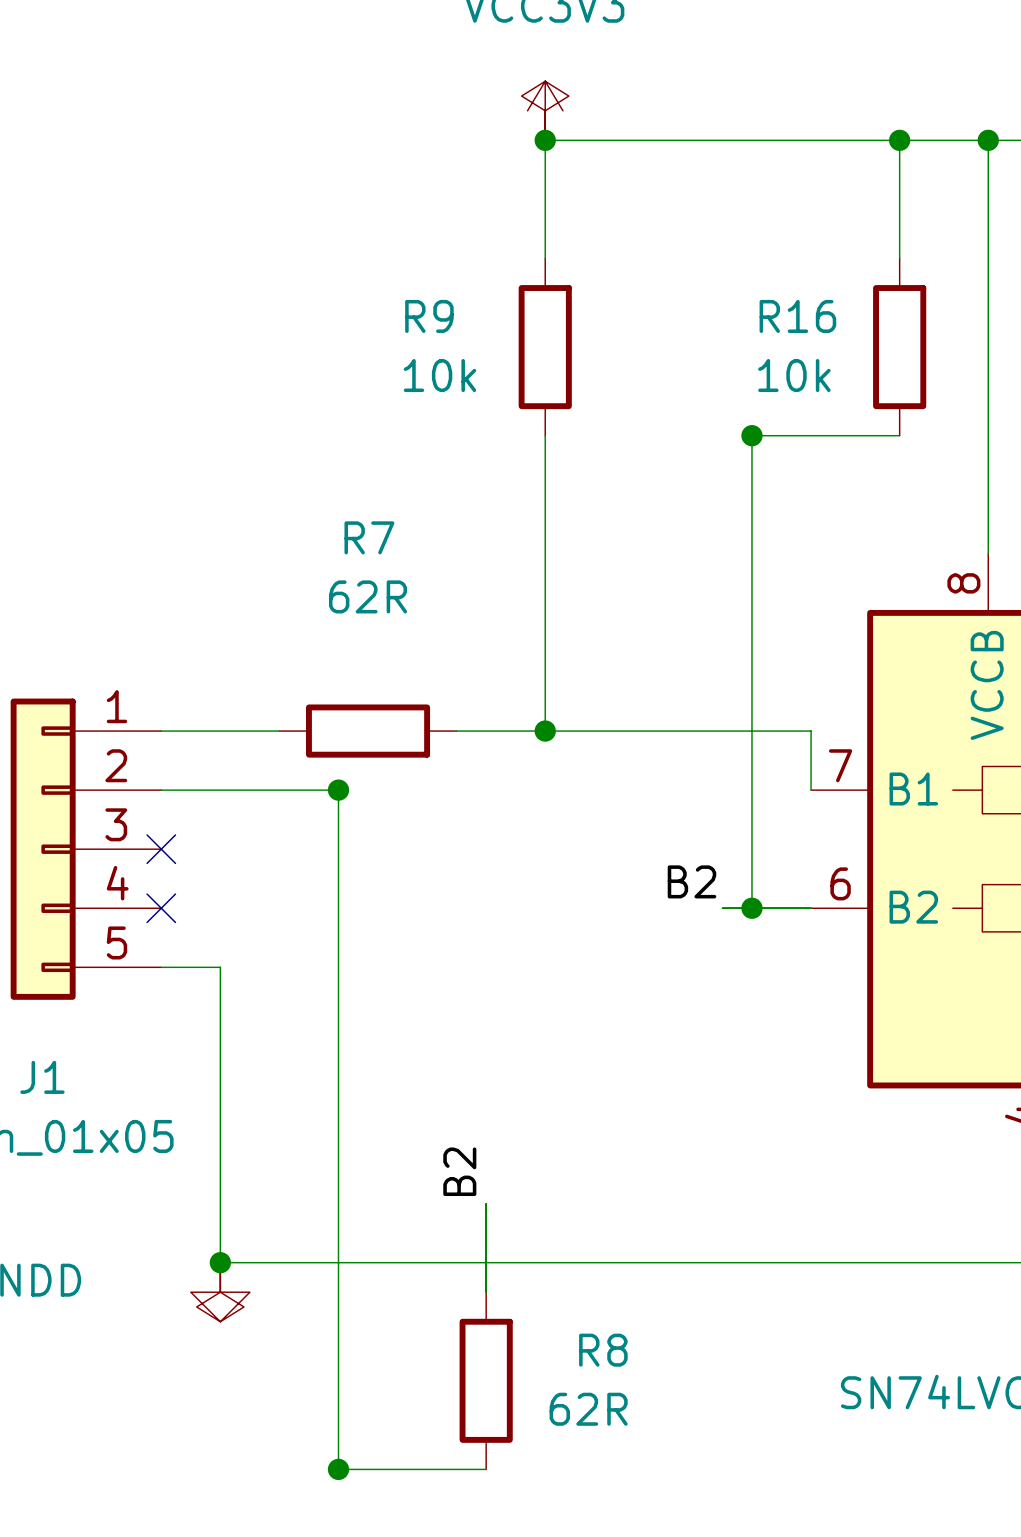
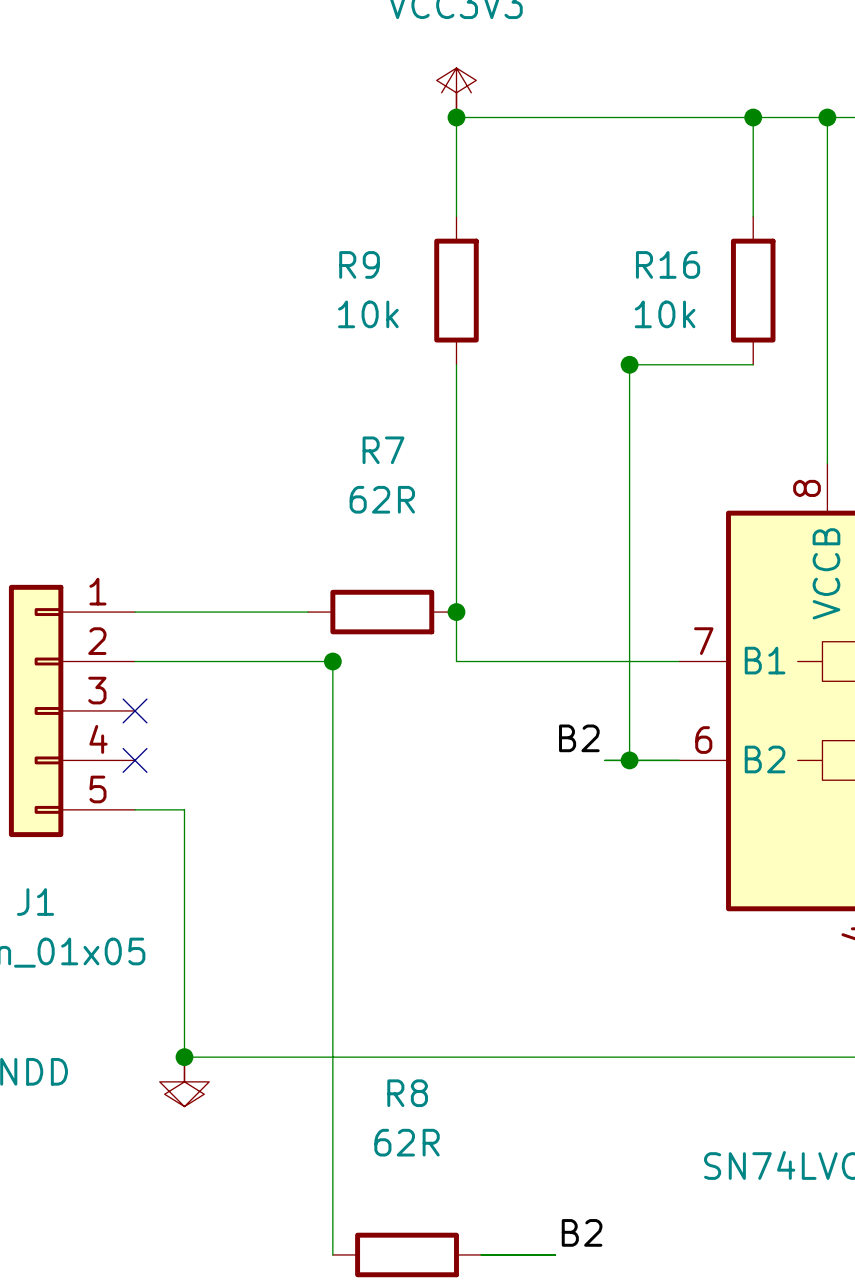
wire: none -> (233, 612) (308, 612)
R7 position: (368, 731) -> (382, 612)
wire: (456, 731) (811, 731) (811, 790) -> (456, 612) (456, 661) (679, 661)
wire: (338, 790) (338, 1469) (486, 1469) -> (283, 661) (332, 661) (332, 1254)
junction position: (338, 790) -> (332, 661)
label rotation: 0° (459, 1171) -> 90° clockwise (582, 1232)
label position: B2 (459, 1171) -> B2 (582, 1232)
wire: (486, 1203) (486, 1292) -> none
R8 name position: R8 (603, 1350) -> R8 (407, 1093)
R8 rotation: 0° (486, 1380) -> 90° clockwise (407, 1254)
R8 position: (486, 1380) -> (407, 1254)
R8 value position: 62R (588, 1409) -> 62R (407, 1142)
junction: (338, 1469) -> none
wire: none -> (481, 1254) (555, 1254)

